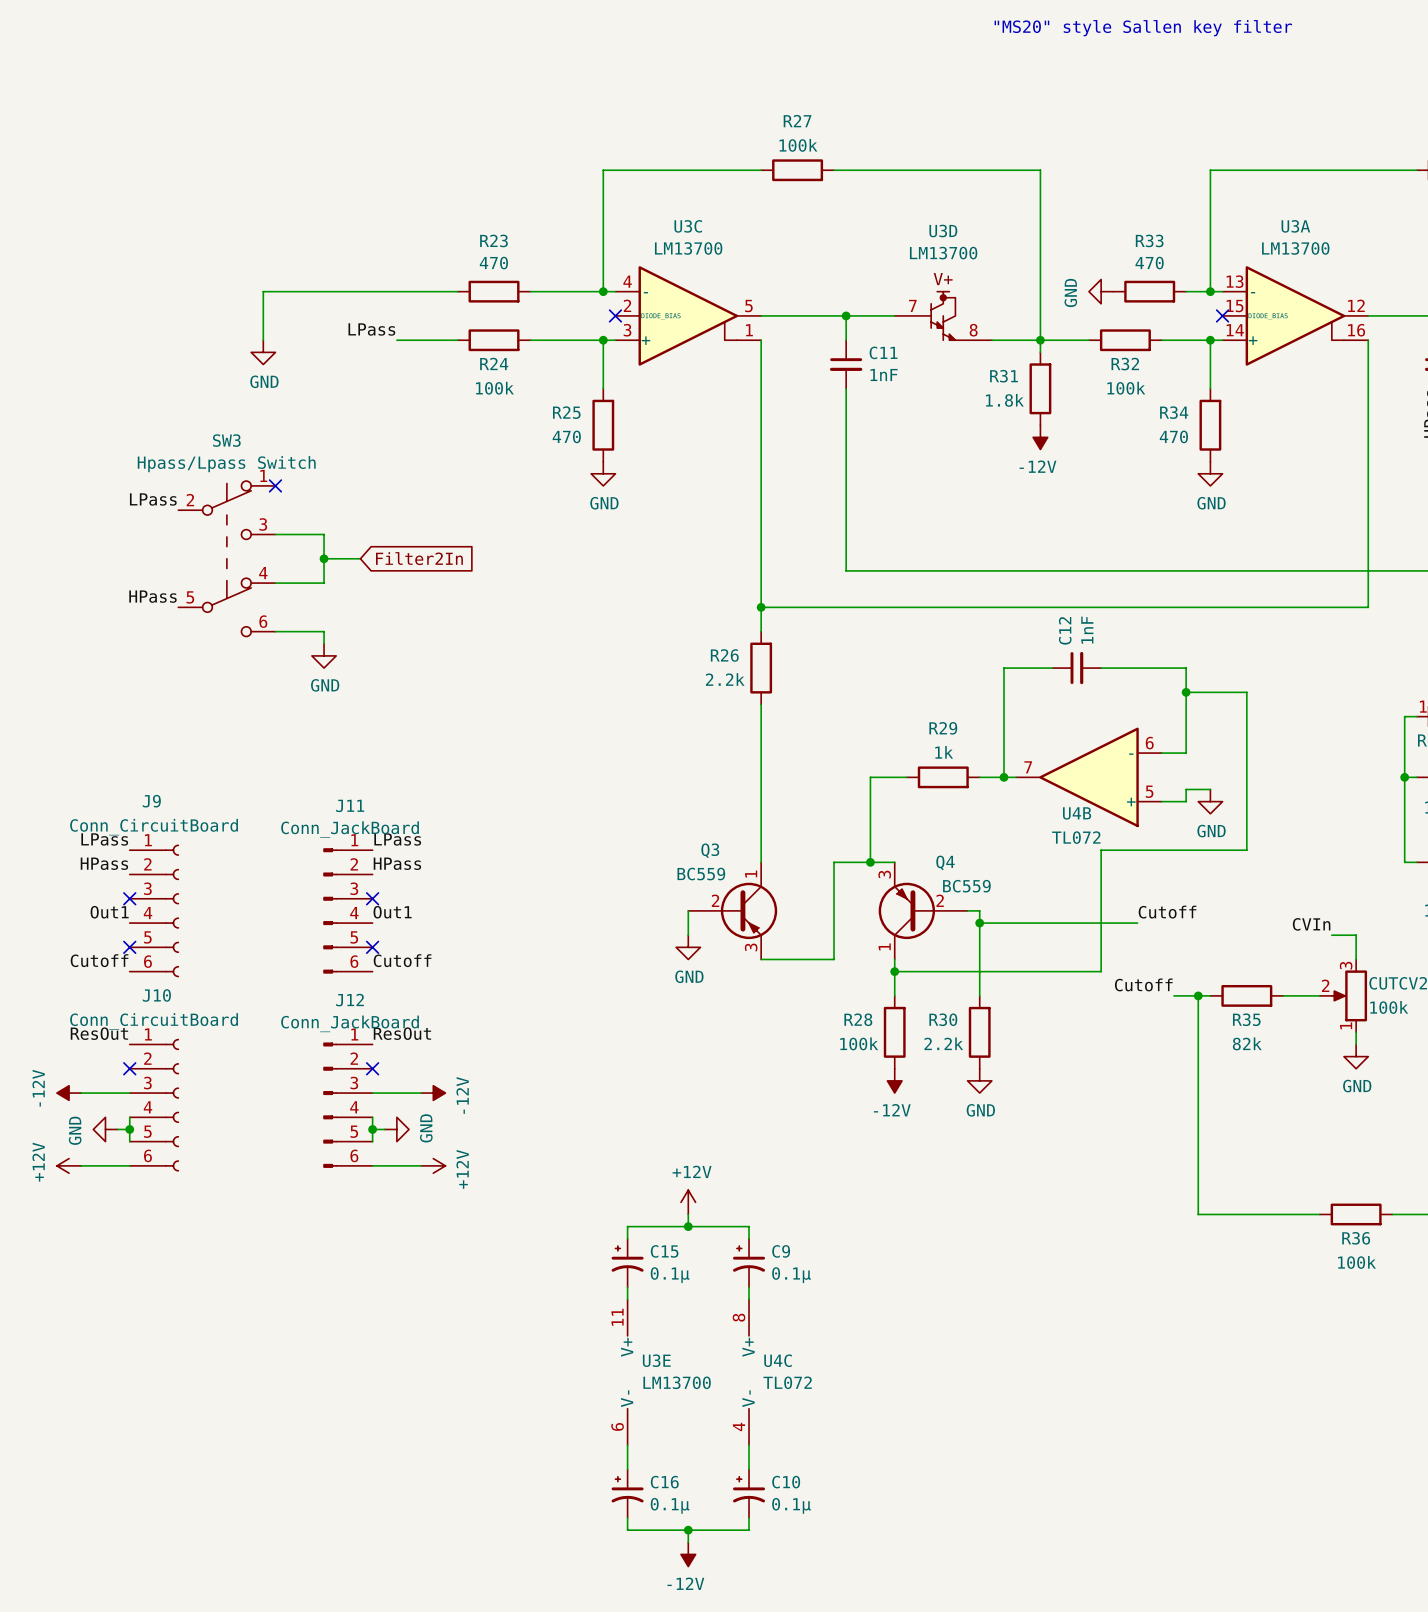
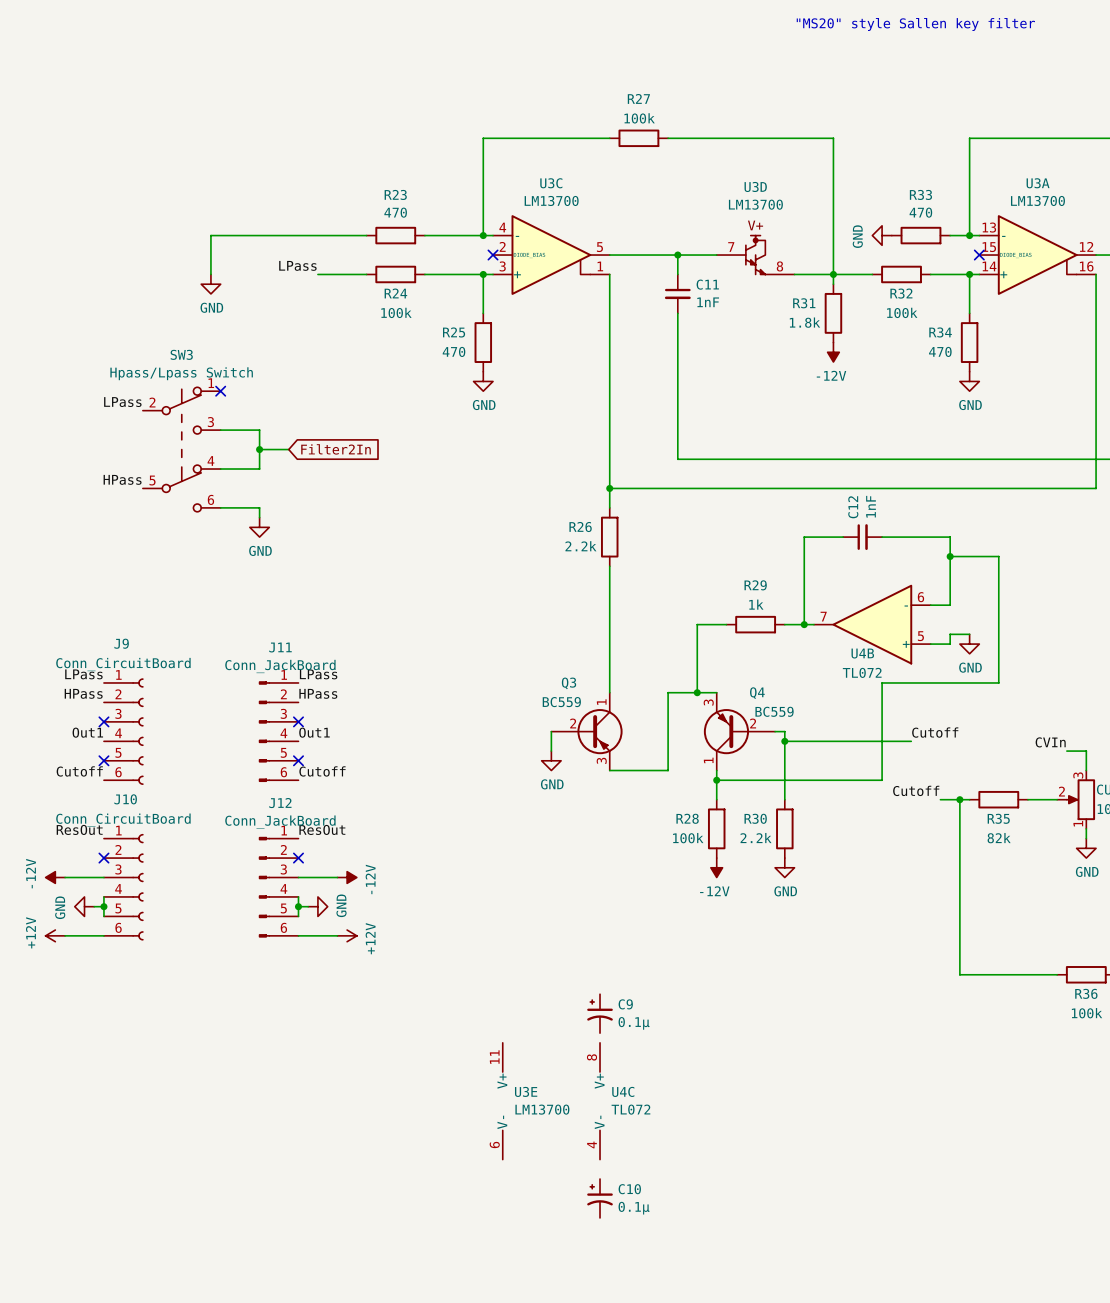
power symbol: +12V (688, 1202) -> none
wire: (688, 1214) (688, 1226) -> none
junction: (688, 1226) -> none
wire: (627, 1238) (627, 1226) (749, 1226) (749, 1238) -> none
C15: 0.1µ (627, 1263) -> none
wire: (627, 1287) (627, 1299) -> none
wire: (749, 1287) (749, 1299) -> none
wire: (627, 1445) (627, 1469) -> none
wire: (749, 1445) (749, 1469) -> none
C16: 0.1µ (627, 1493) -> none
wire: (627, 1518) (627, 1530) (749, 1530) (749, 1518) -> none
wire: (688, 1530) (688, 1542) -> none
junction: (688, 1530) -> none
power symbol: -12V (688, 1554) -> none

